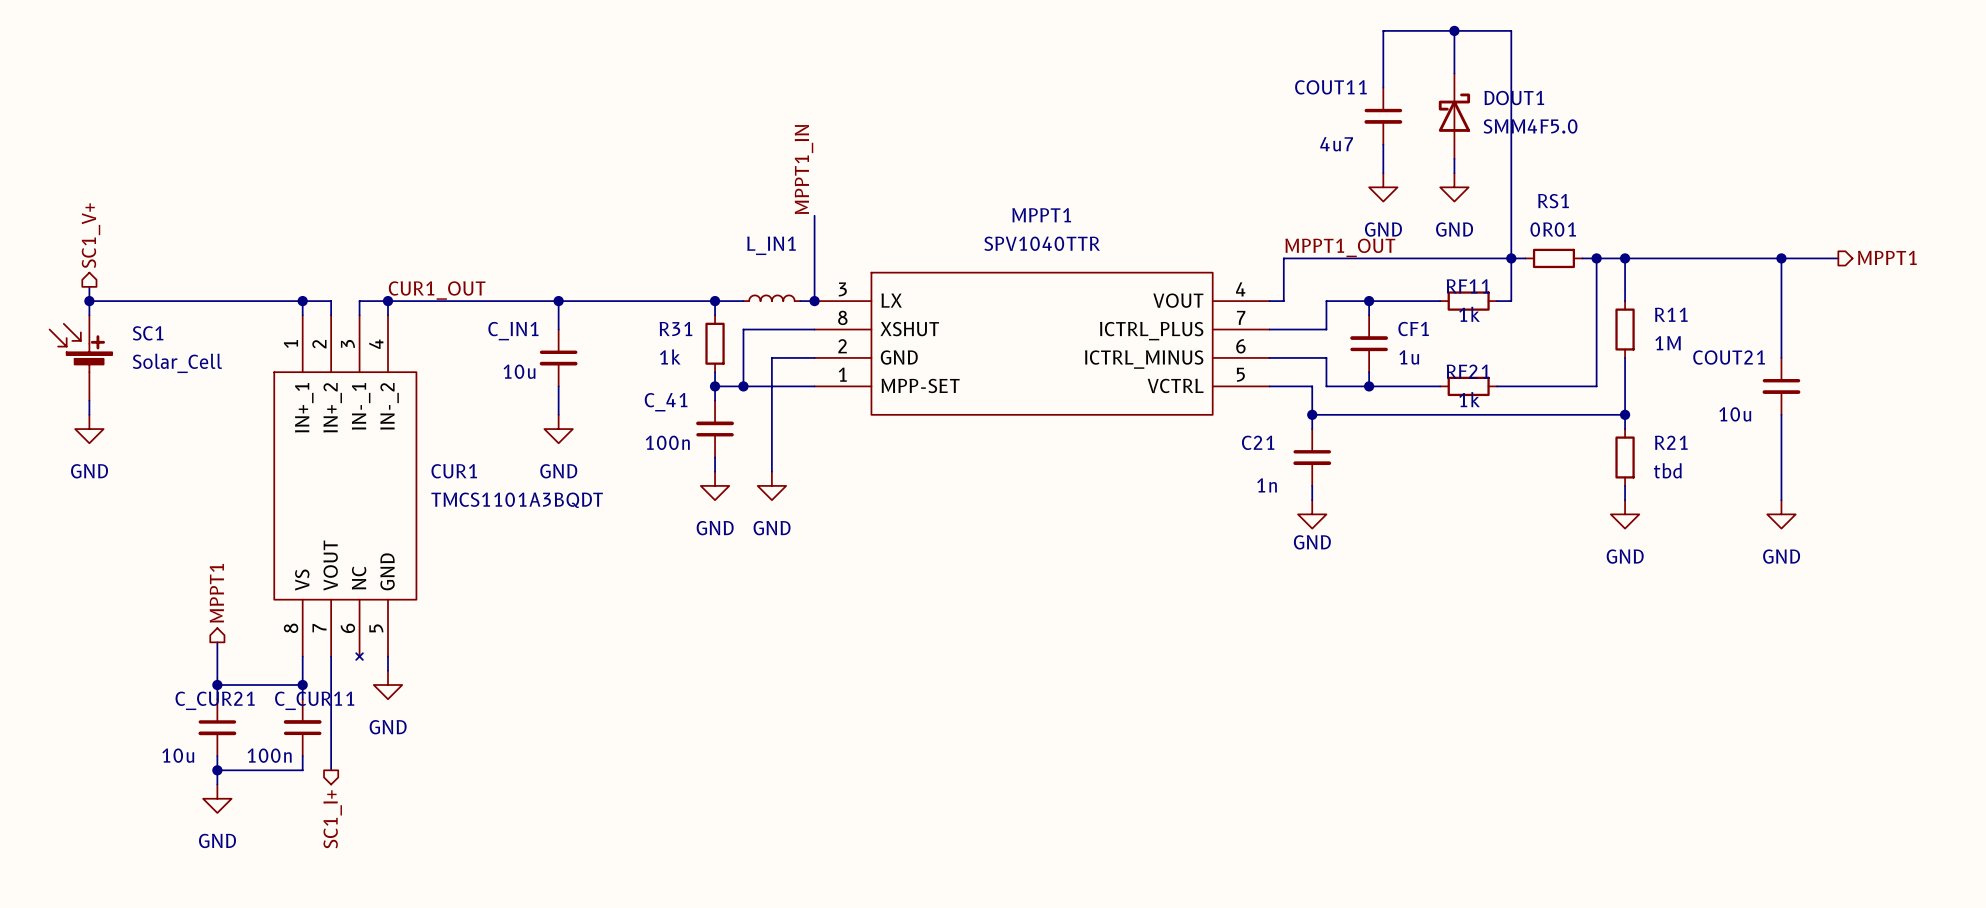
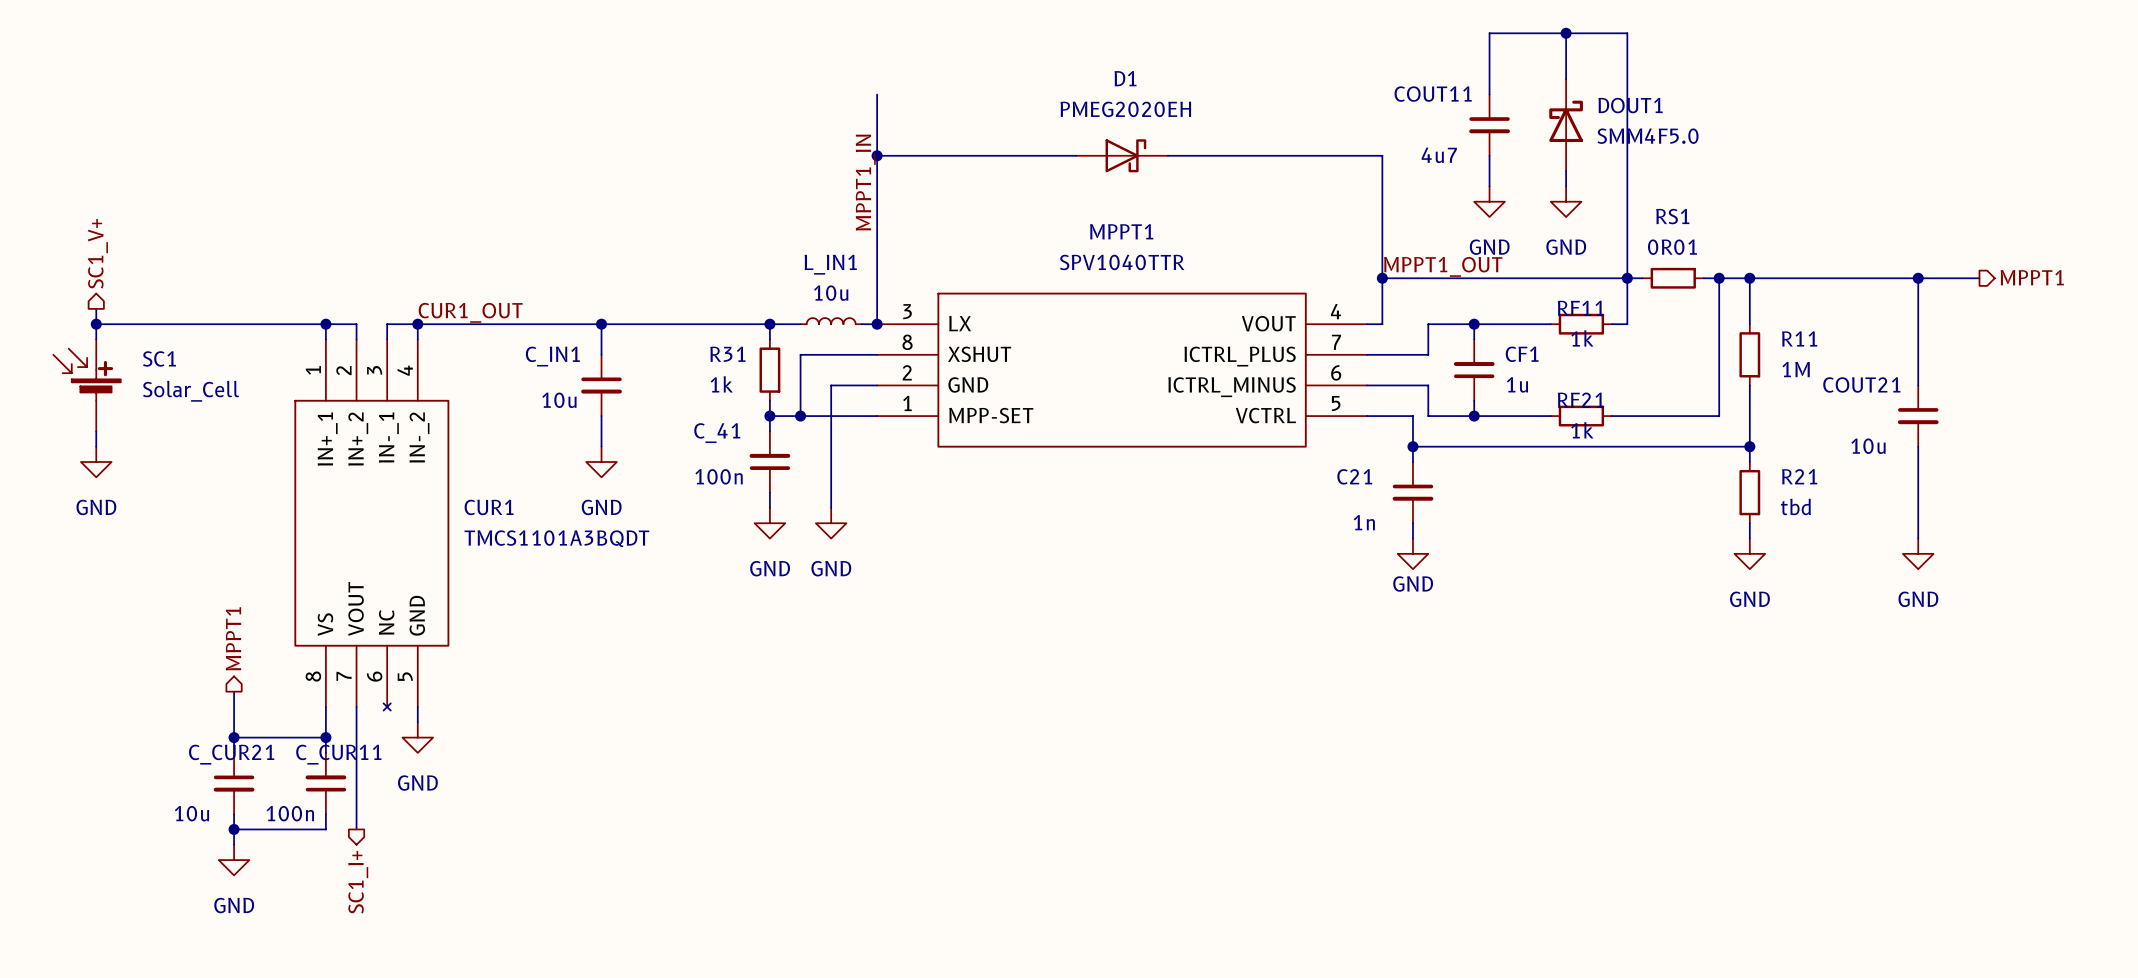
wire: none -> (877, 94) (877, 232)
wire: none -> (877, 155) (1076, 155)
junction: none -> (877, 155)
D1: none -> PMEG2020EH (1122, 155)
wire: none -> (1168, 155) (1382, 155) (1382, 278)
junction: none -> (1382, 278)
L_IN1 value: none -> 10u (831, 293)

